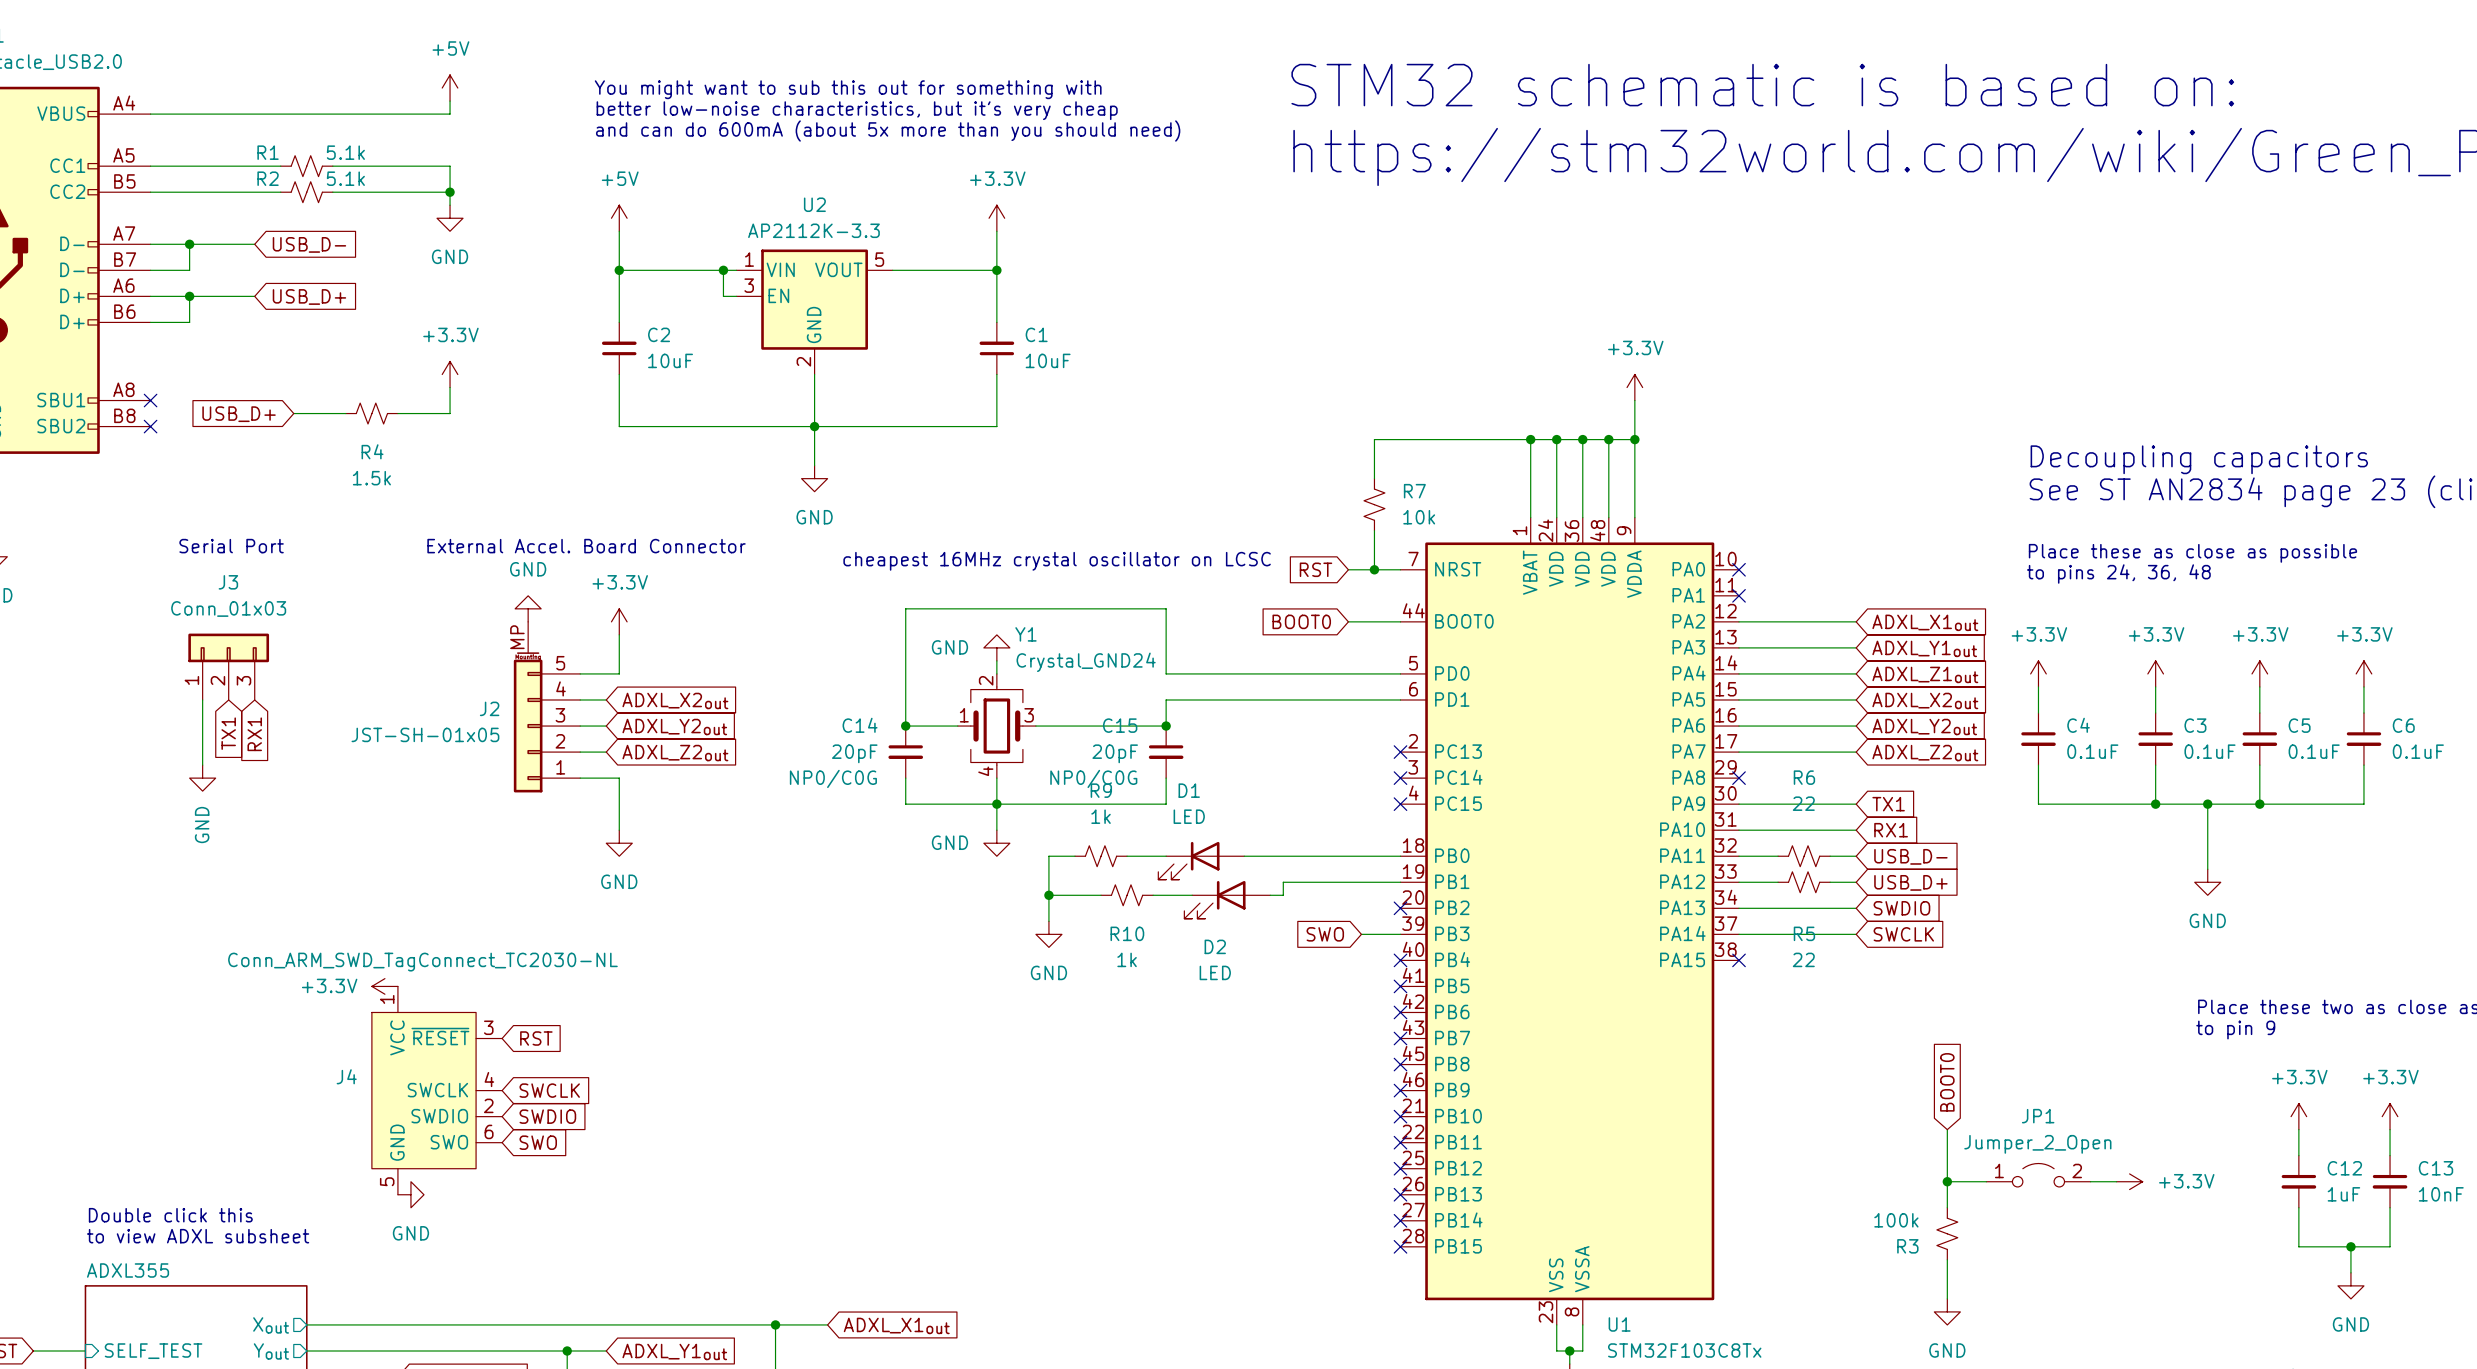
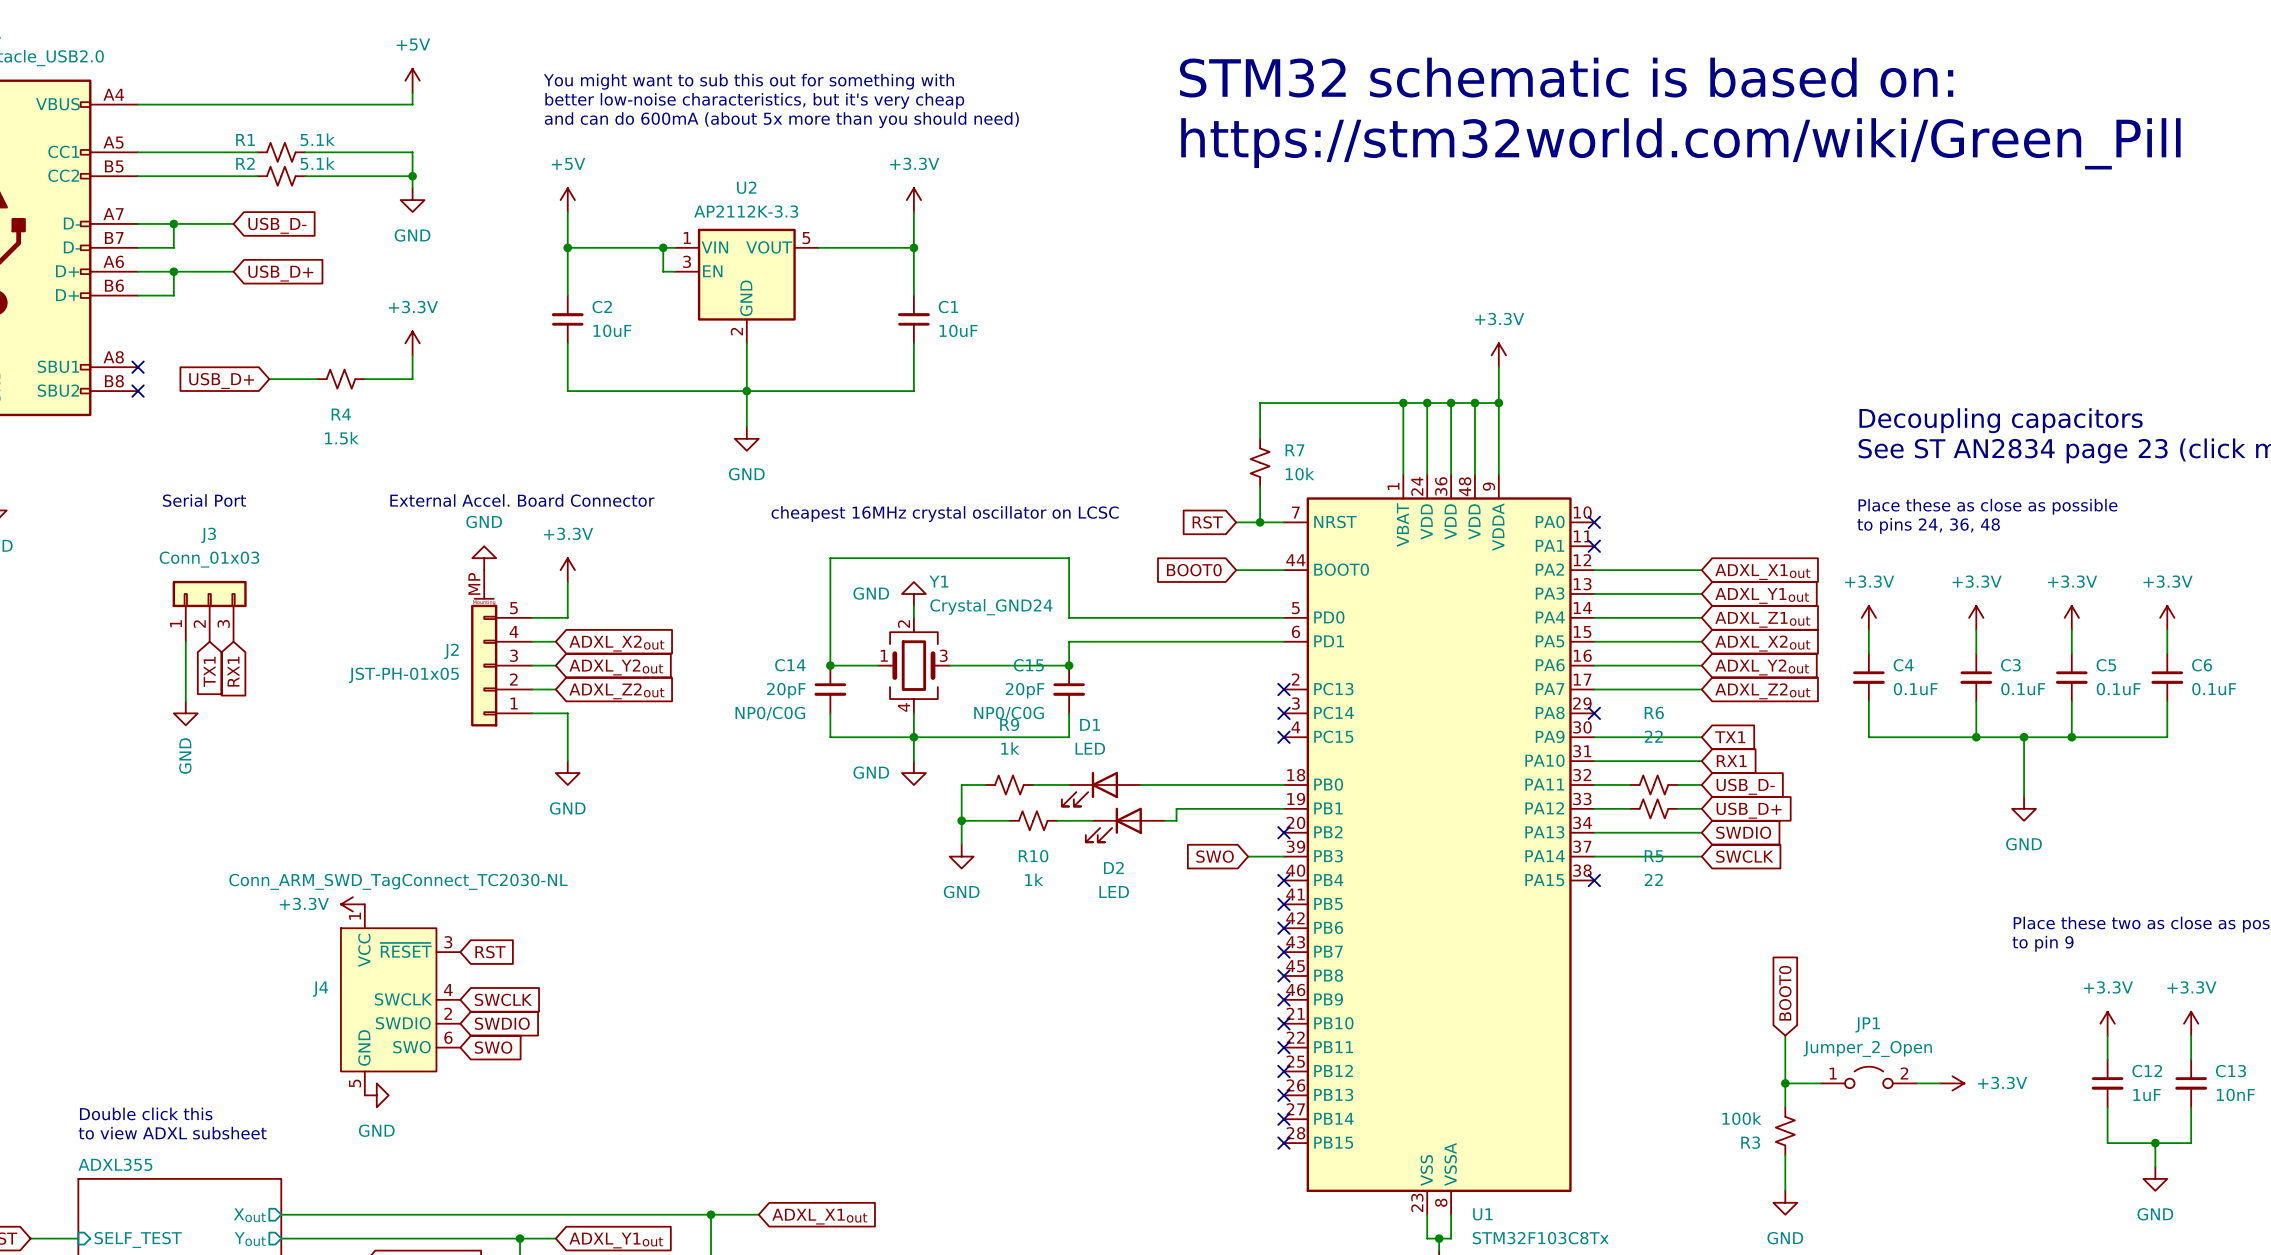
J2 value: JST-SH-01x05 (425, 734) -> JST-PH-01x05 (403, 675)

